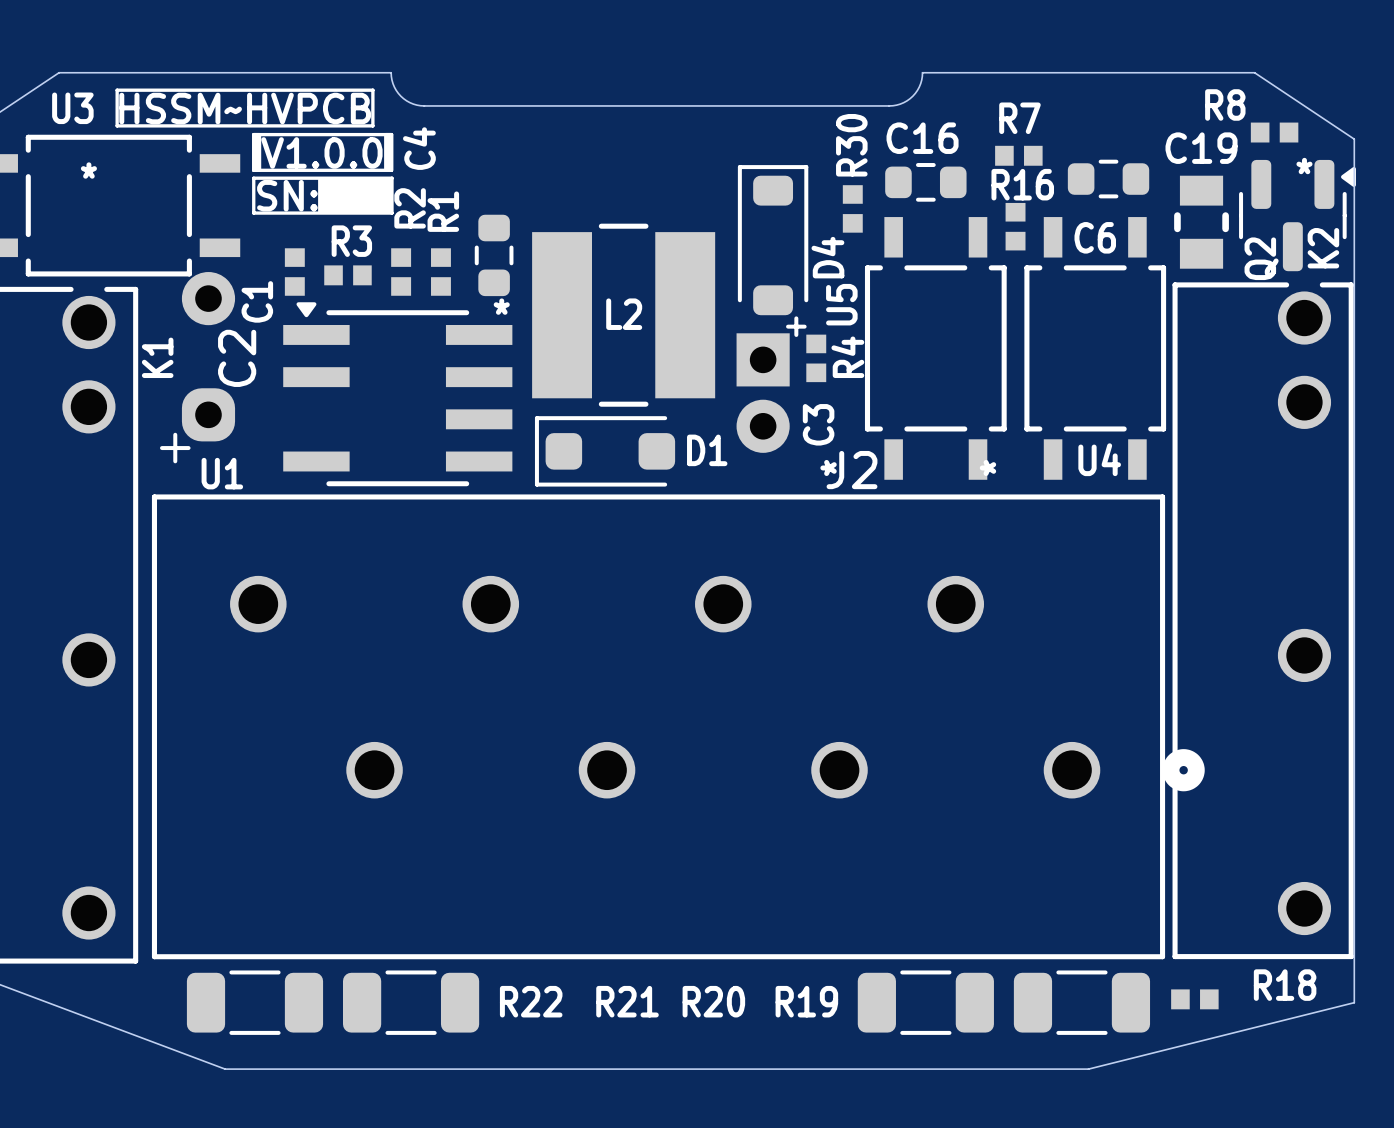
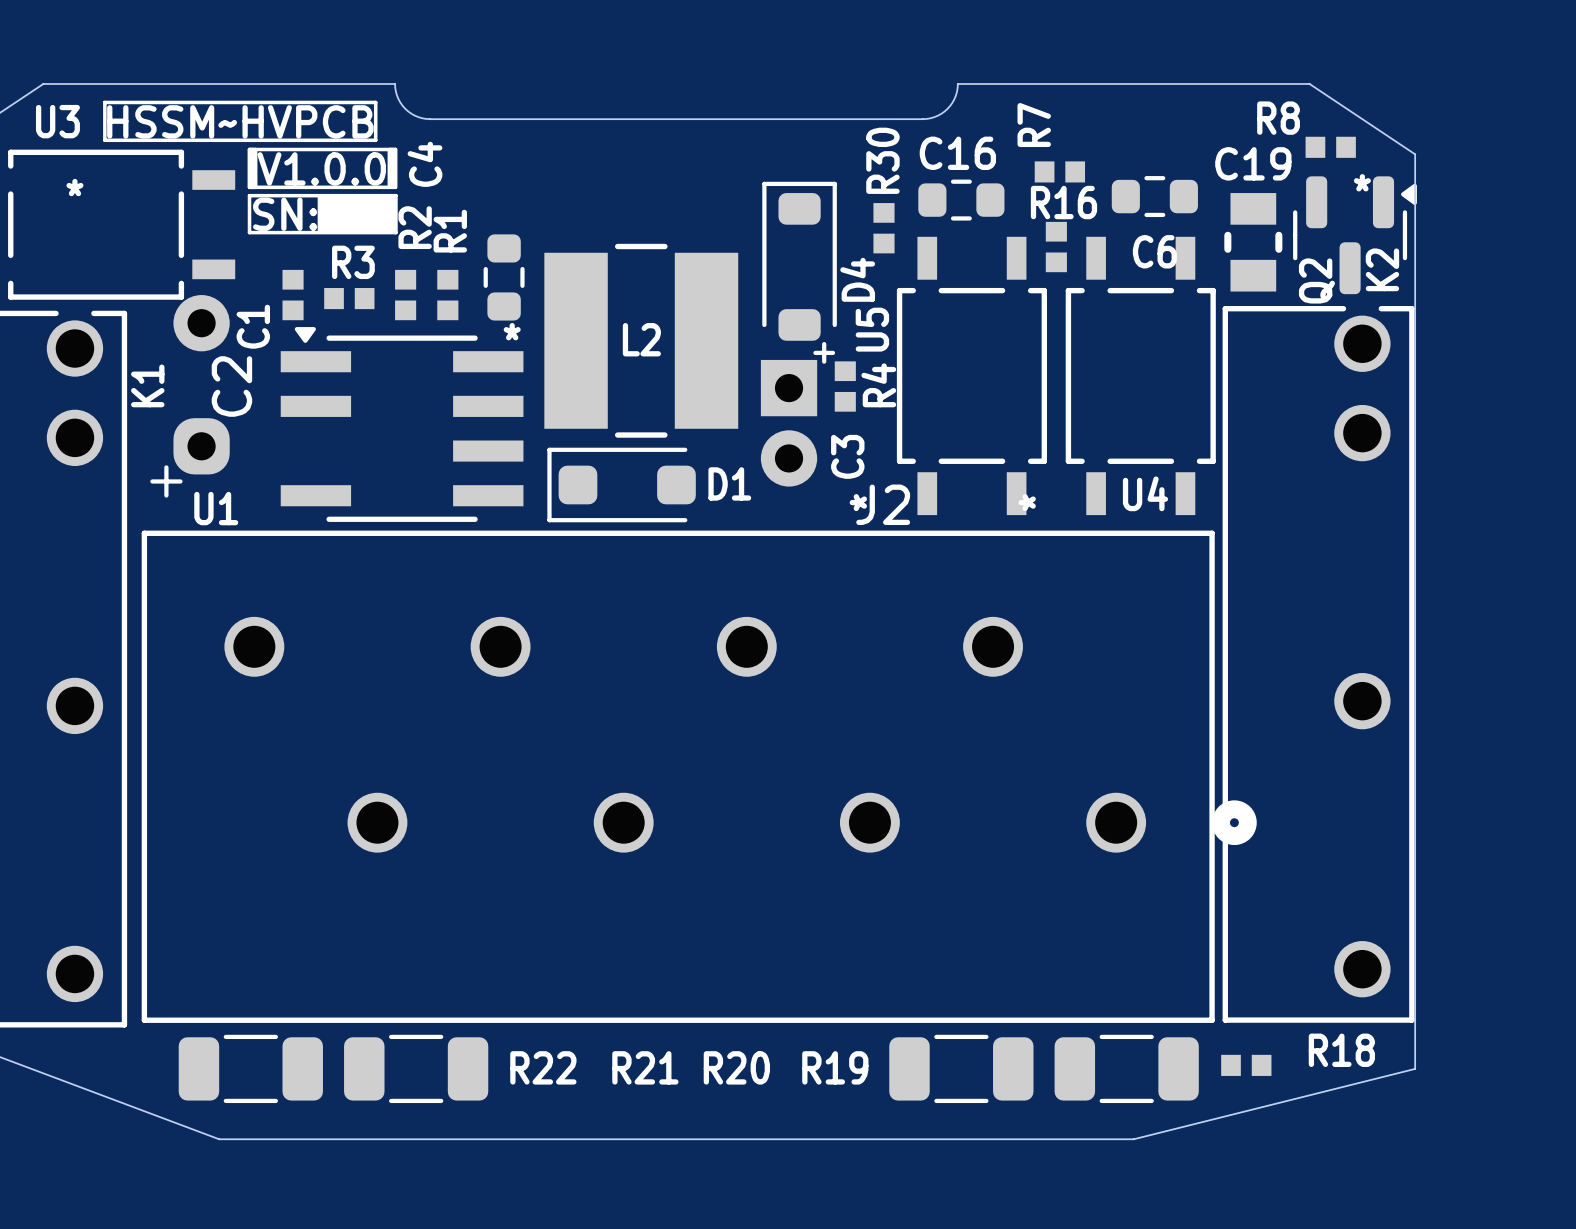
R7 name rotation: 0° (1019, 118) -> 90° counterclockwise (1034, 125)
C6 name position: C6 (1095, 237) -> C6 (1154, 251)

